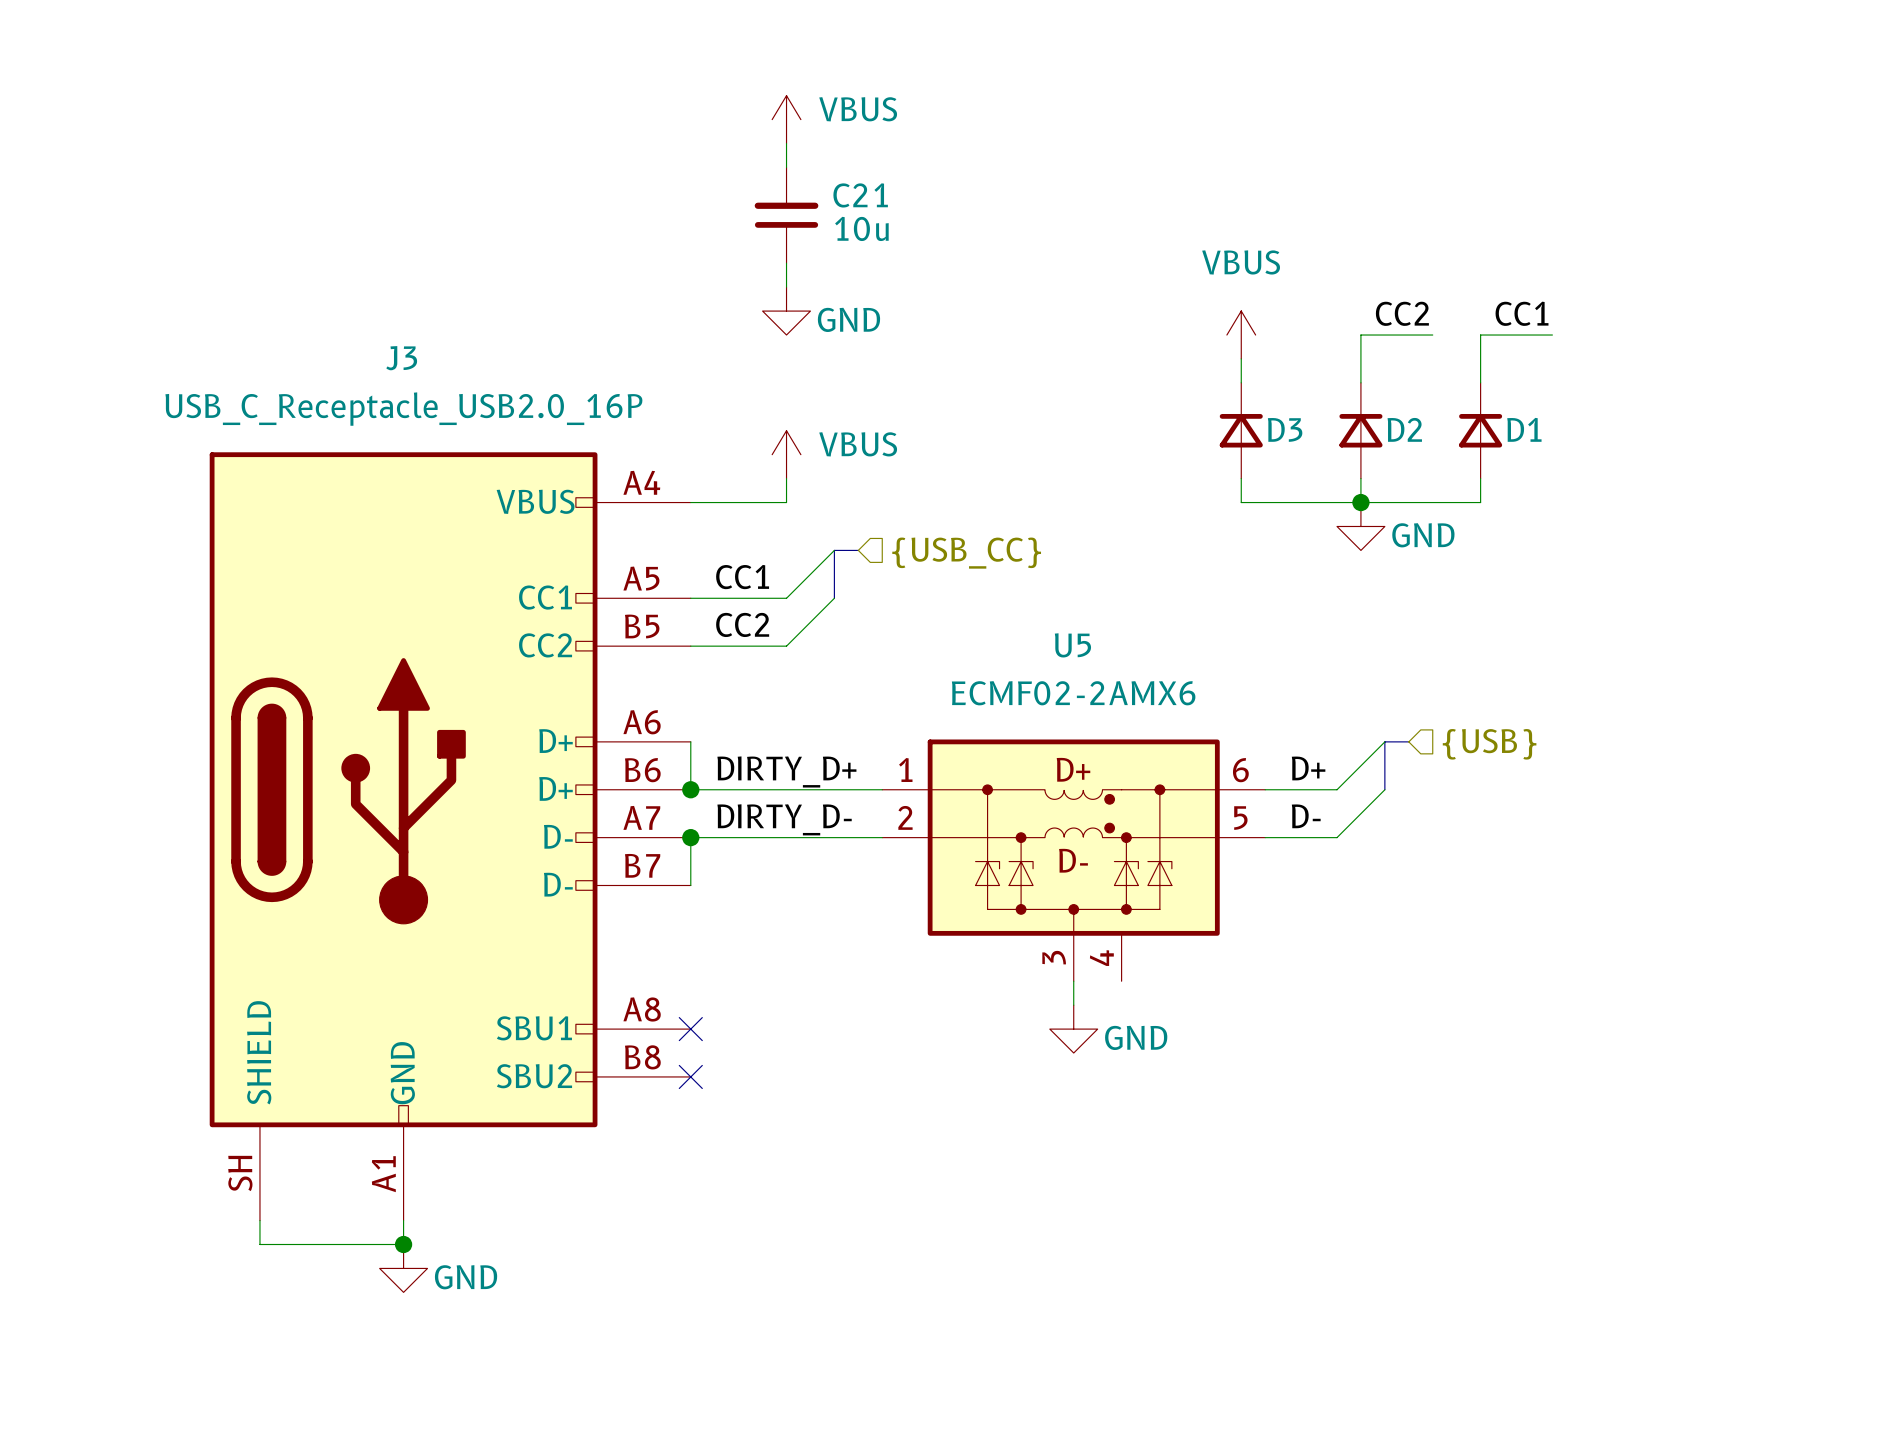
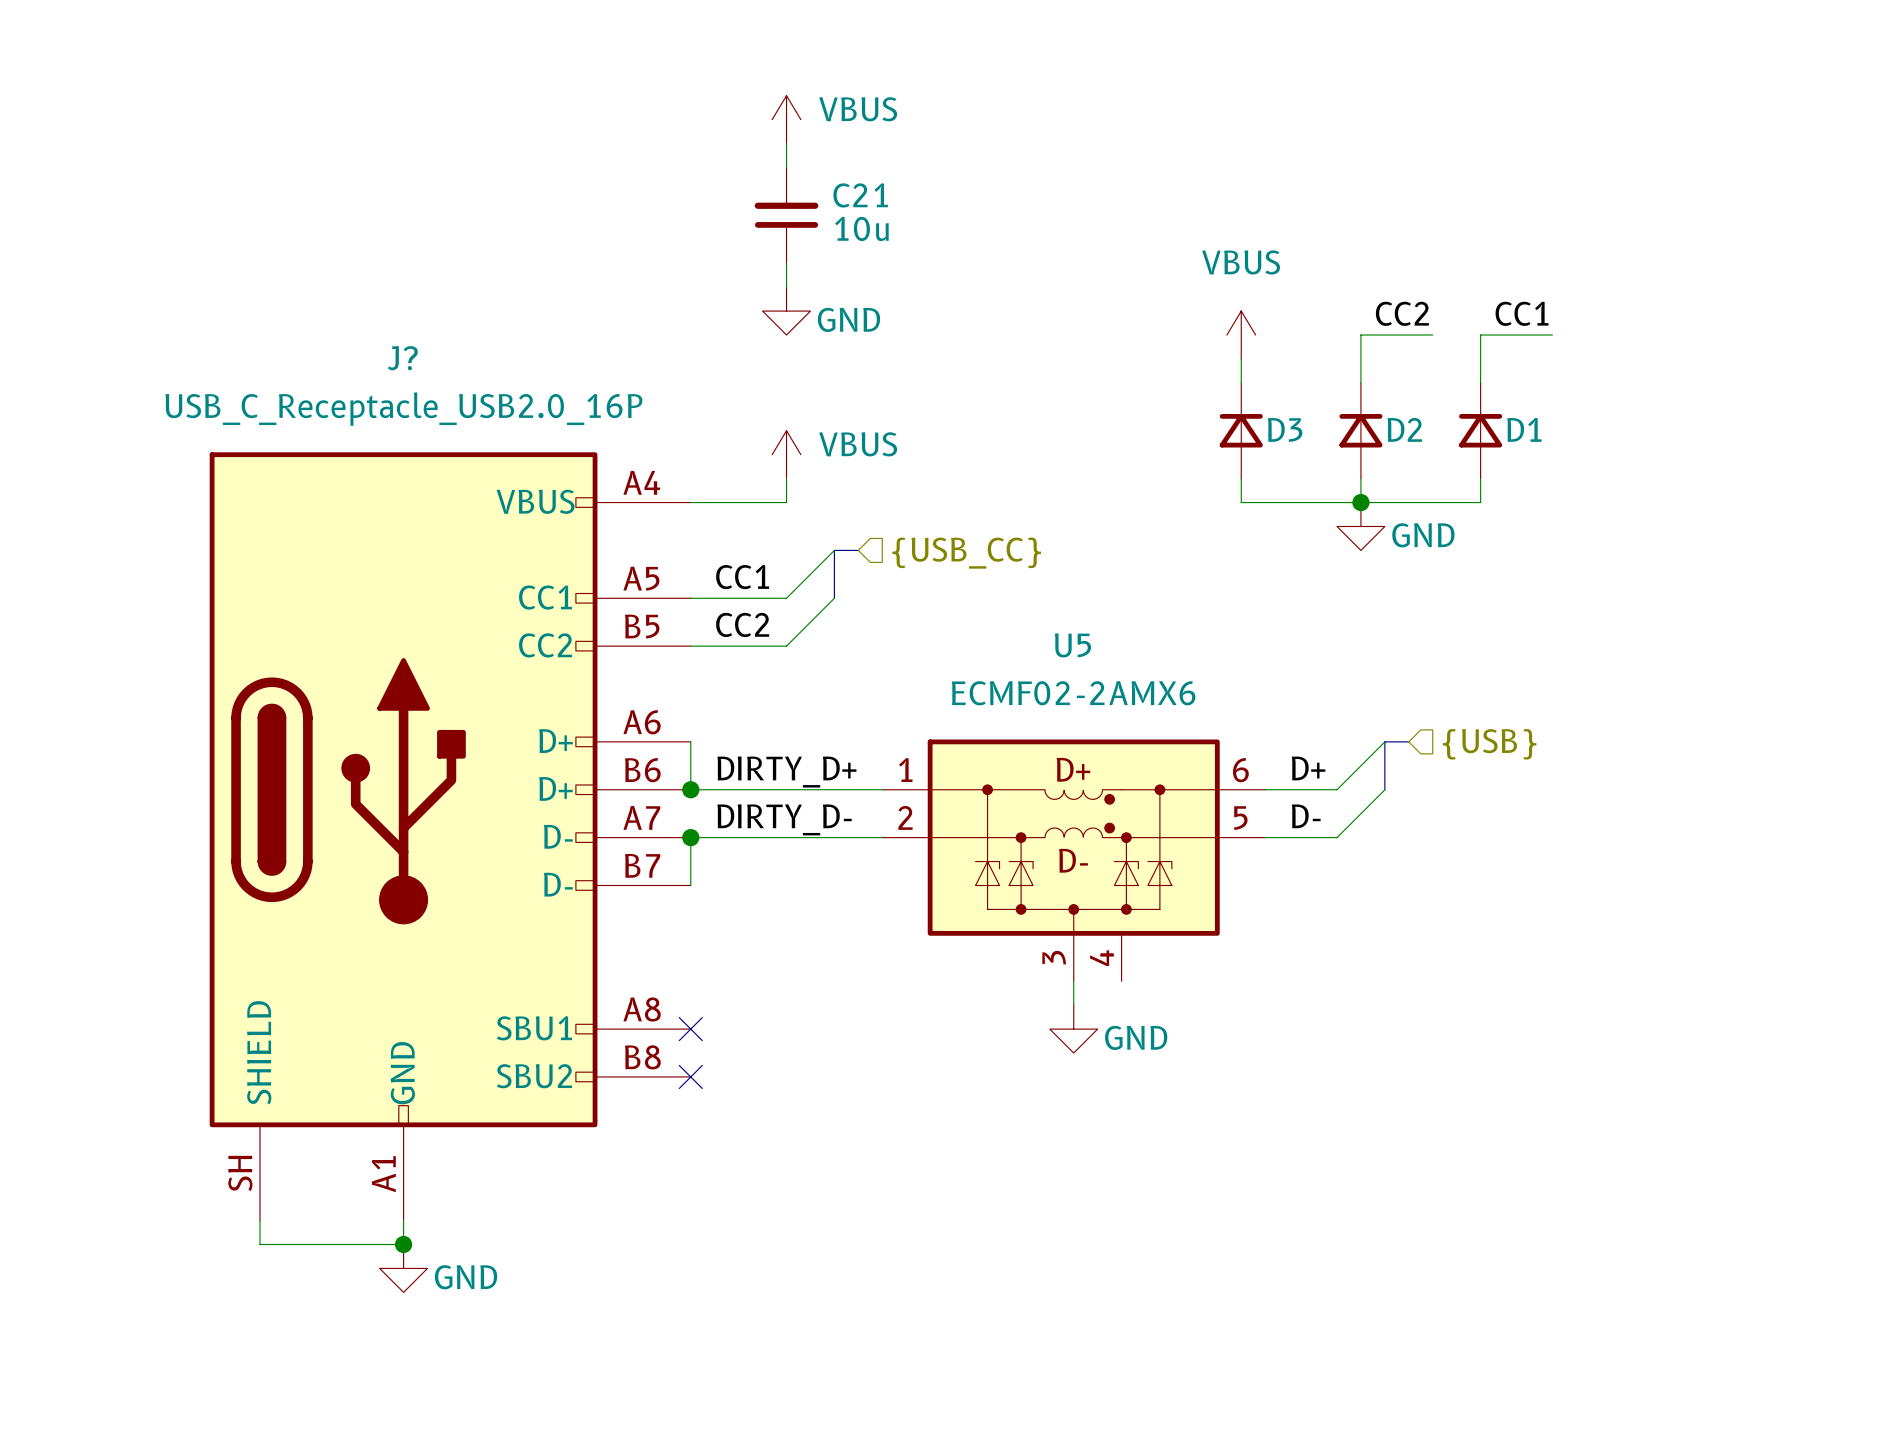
J3 name: J3 (401, 358) -> J? (402, 358)

